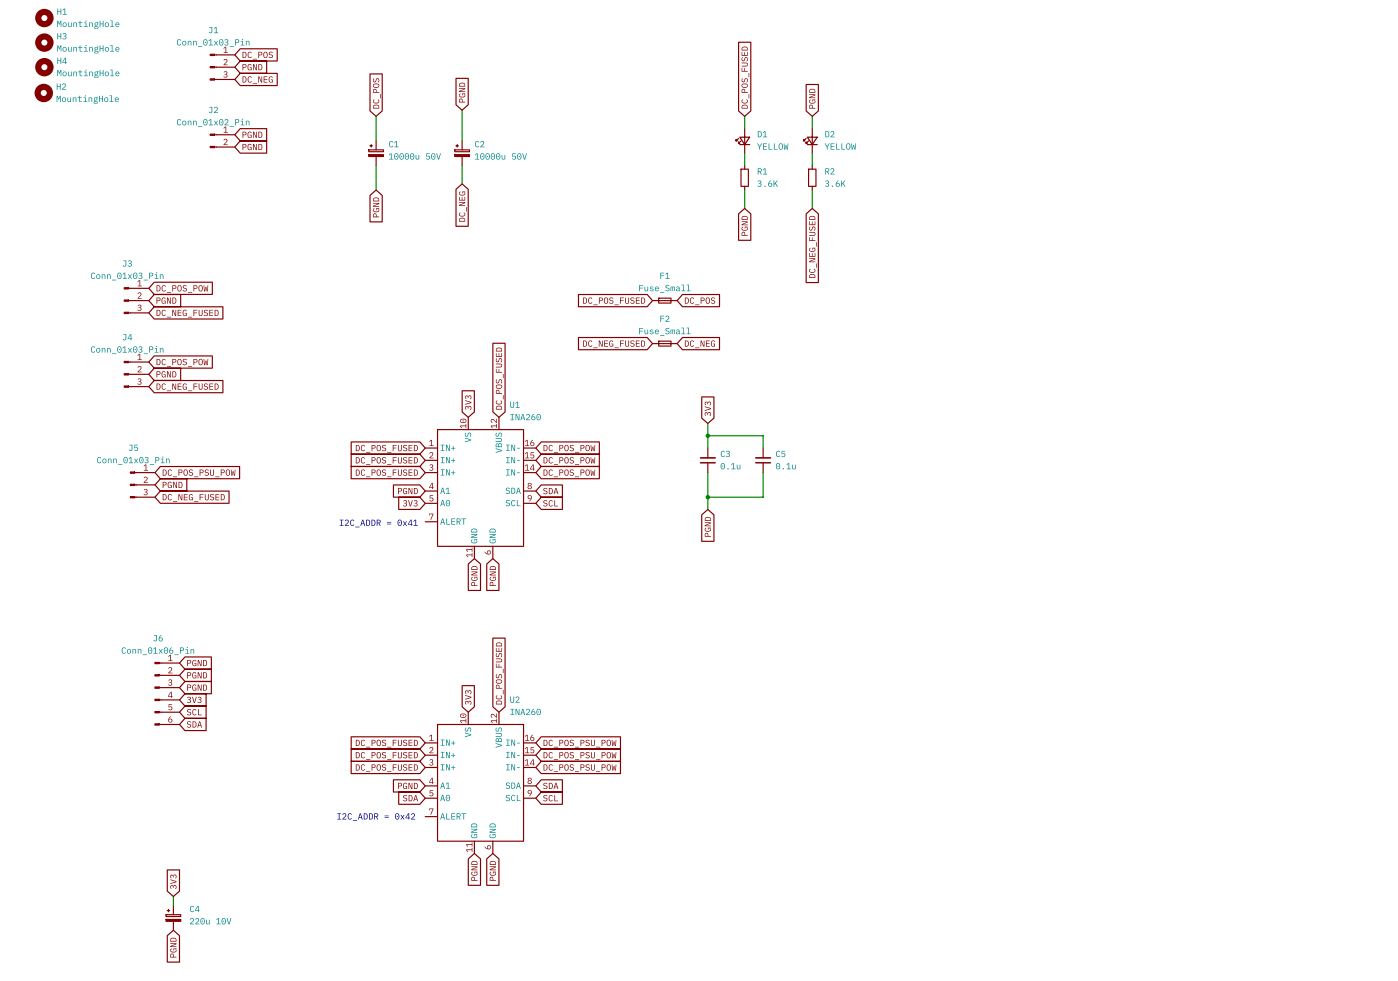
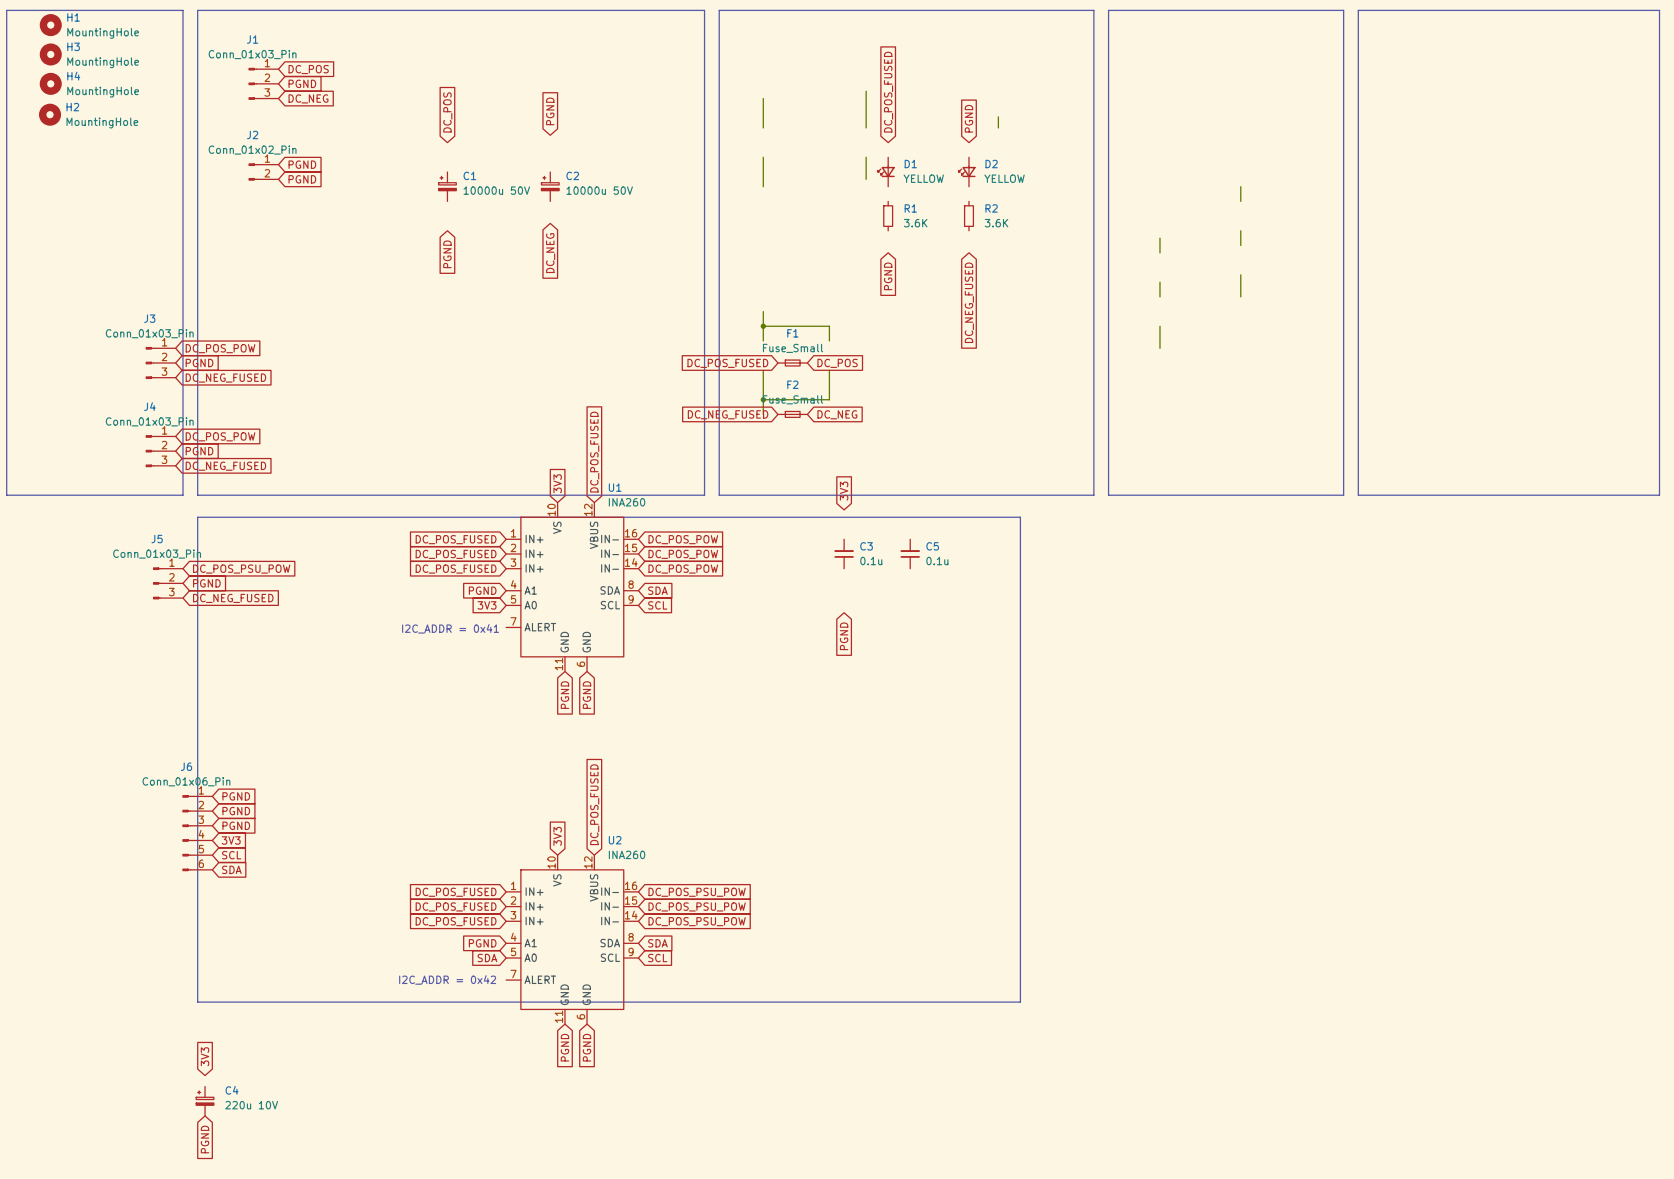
line: none -> (6, 10) (182, 10) (182, 495) (6, 495) (6, 10)
line: none -> (197, 10) (197, 495) (704, 495) (704, 10) (197, 10)
line: none -> (719, 10) (1093, 10) (1093, 495) (719, 495) (719, 10)
line: none -> (1108, 10) (1343, 10) (1343, 495) (1108, 495) (1108, 10)
line: none -> (1358, 10) (1659, 10) (1659, 495) (1358, 495) (1358, 10)
wire: none -> (866, 91) (866, 127)
wire: none -> (763, 98) (763, 127)
wire: none -> (998, 116) (998, 127)
wire: (462, 110) (462, 140) -> none
wire: (376, 116) (376, 140) -> none
wire: (744, 116) (744, 128) -> none
wire: (812, 116) (812, 128) -> none
wire: none -> (763, 157) (763, 186)
wire: (744, 153) (744, 165) -> none
wire: (812, 153) (812, 165) -> none
wire: none -> (1240, 186) (1240, 201)
wire: (376, 165) (376, 190) -> none
wire: (462, 165) (462, 183) -> none
wire: (744, 190) (744, 208) -> (866, 157) (866, 179)
wire: (812, 190) (812, 208) -> none
wire: none -> (1240, 230) (1240, 245)
wire: none -> (1159, 238) (1159, 252)
wire: none -> (1240, 274) (1240, 296)
wire: none -> (1159, 282) (1159, 296)
wire: none -> (763, 311) (763, 340)
wire: none -> (763, 326) (829, 326) (829, 340)
junction: none -> (763, 326)
wire: none -> (1159, 326) (1159, 348)
wire: none -> (763, 370) (763, 414)
wire: none -> (829, 370) (829, 399) (763, 399)
junction: none -> (763, 399)
wire: (707, 423) (707, 448) -> none
line: none -> (197, 517) (1020, 517) (1020, 1002) (197, 1002) (197, 517)
wire: (707, 435) (763, 435) (763, 448) -> none
junction: (707, 435) -> none
wire: (707, 472) (707, 509) -> none
wire: (763, 472) (763, 497) (707, 497) -> none
junction: (707, 497) -> none
wire: (173, 896) (173, 905) -> none

